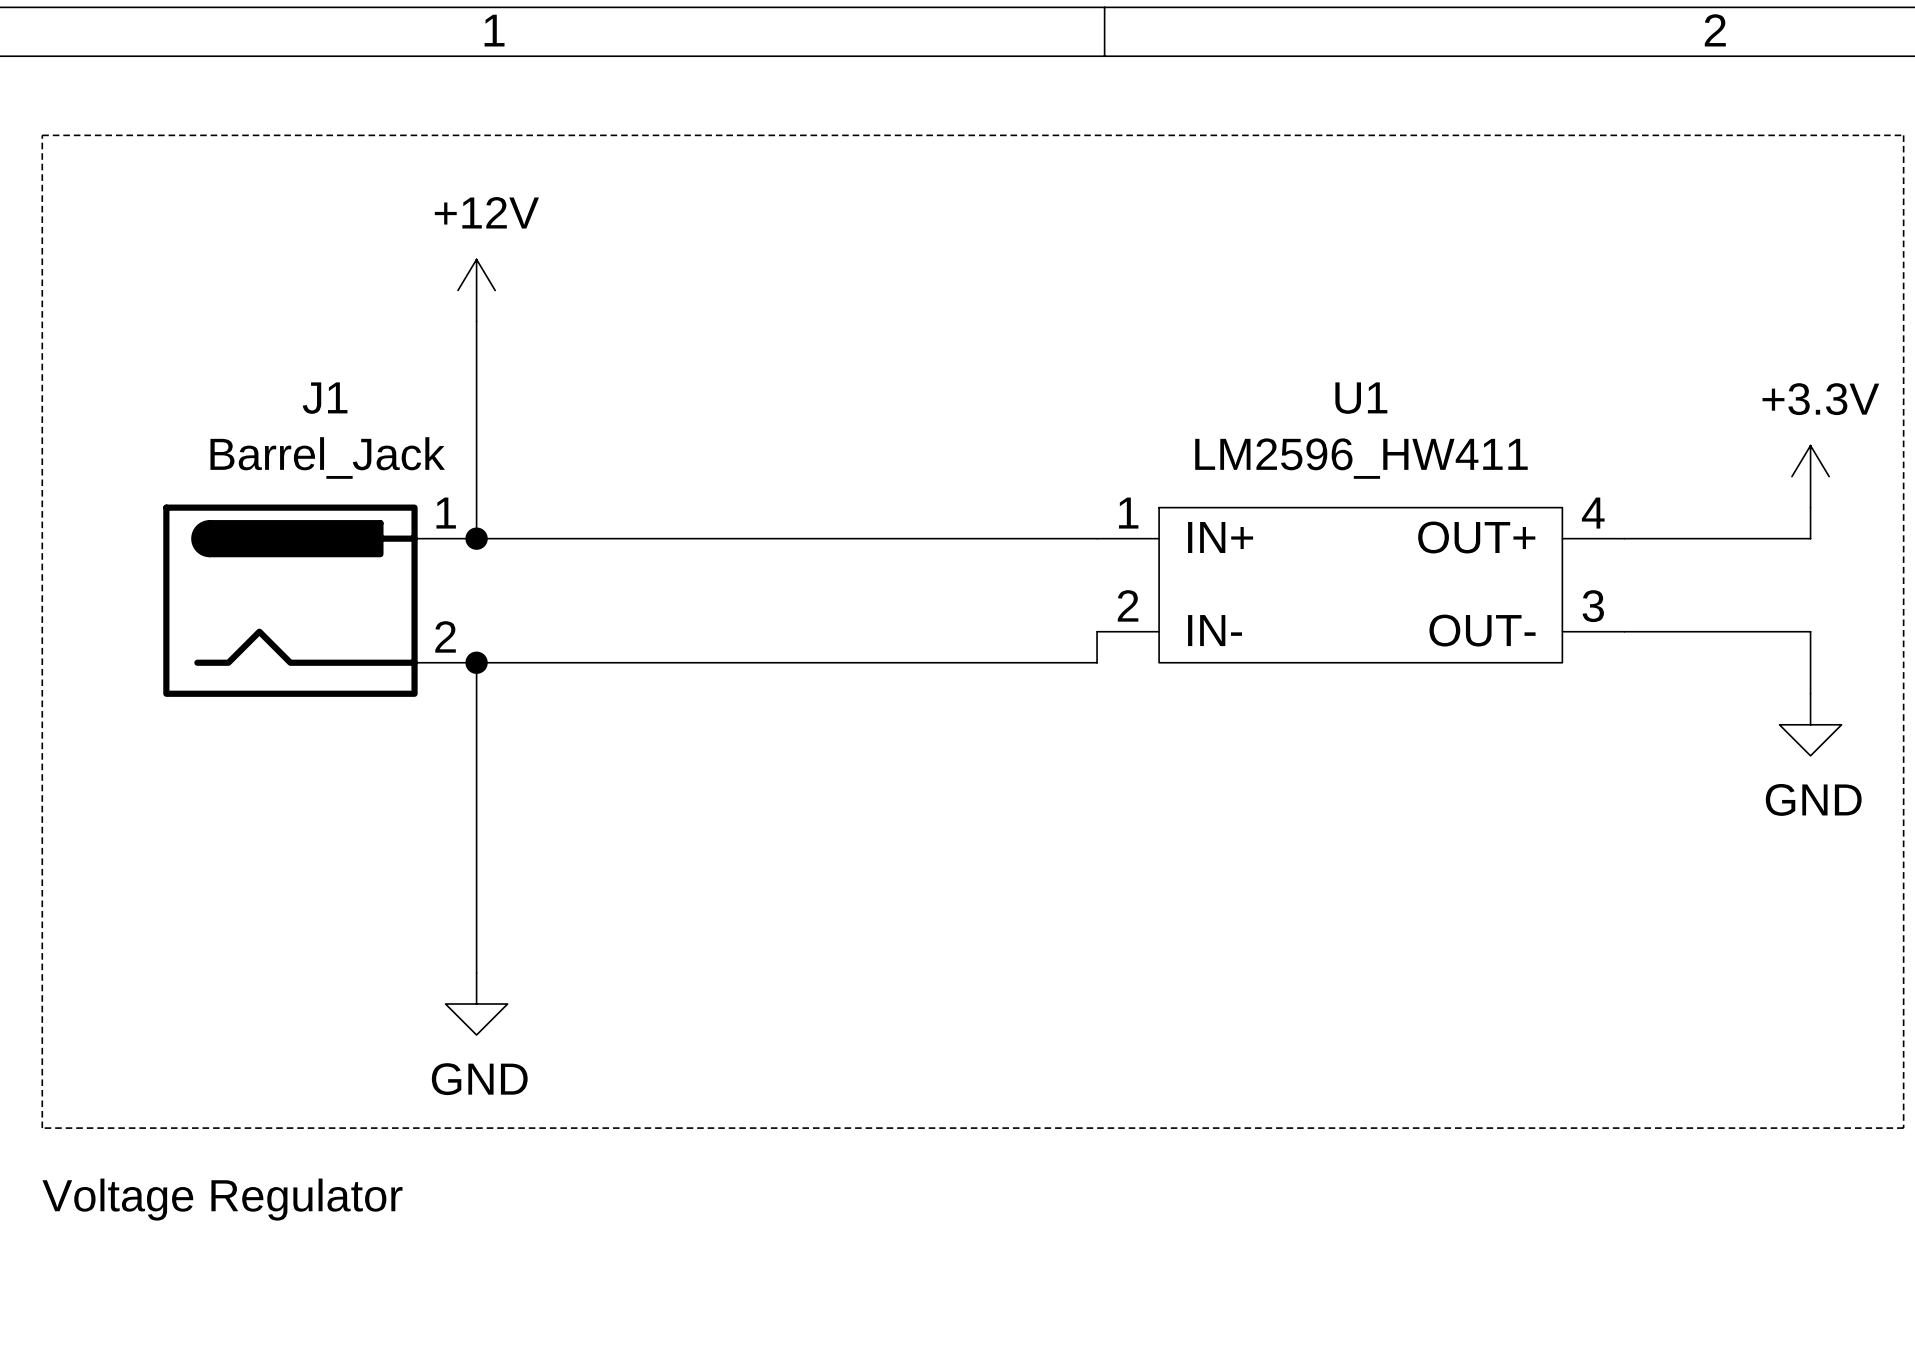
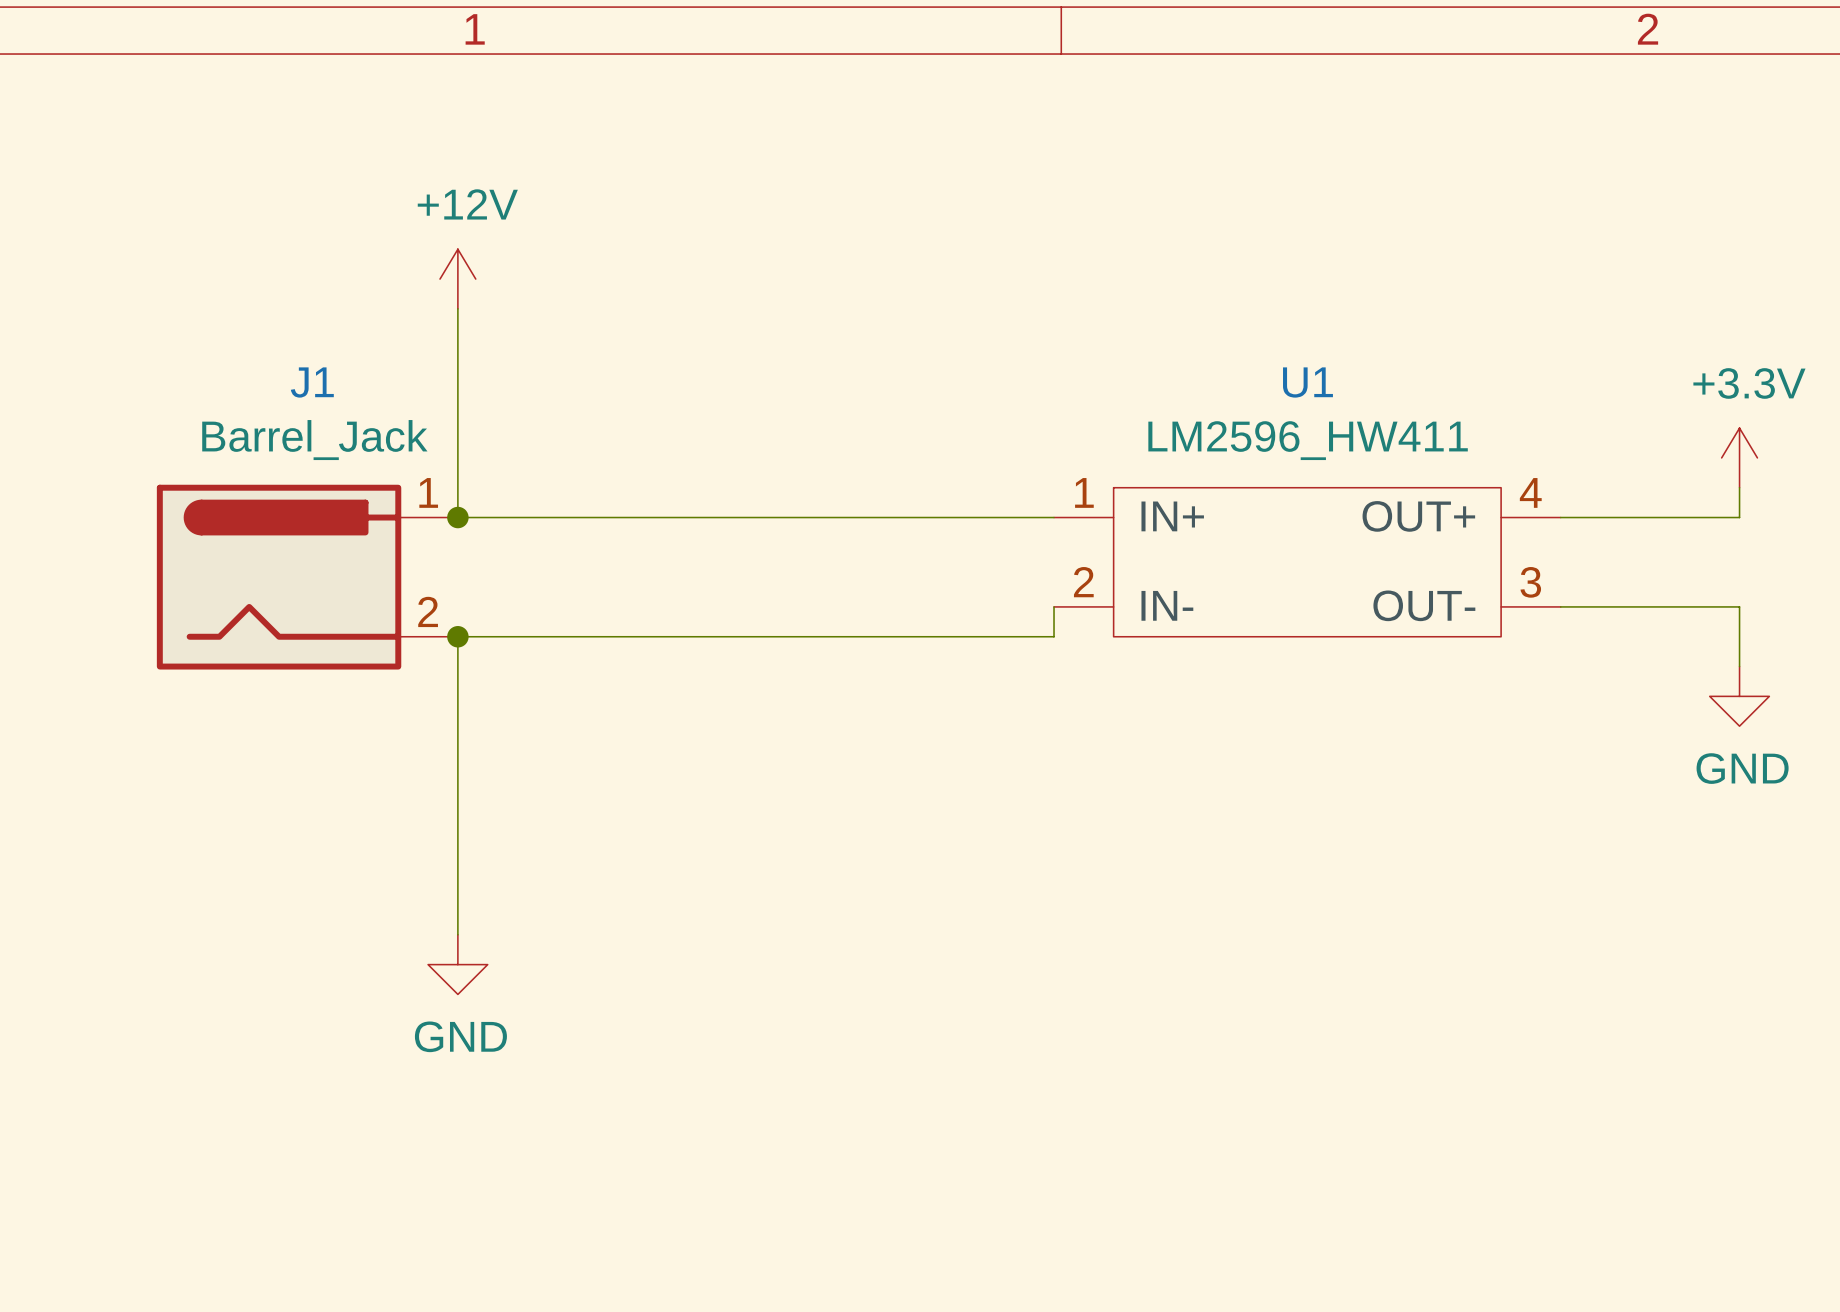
line: (42, 135) (1903, 135) (1903, 1128) (42, 1128) (42, 135) -> none
text: Voltage Regulator (222, 1199) -> none

